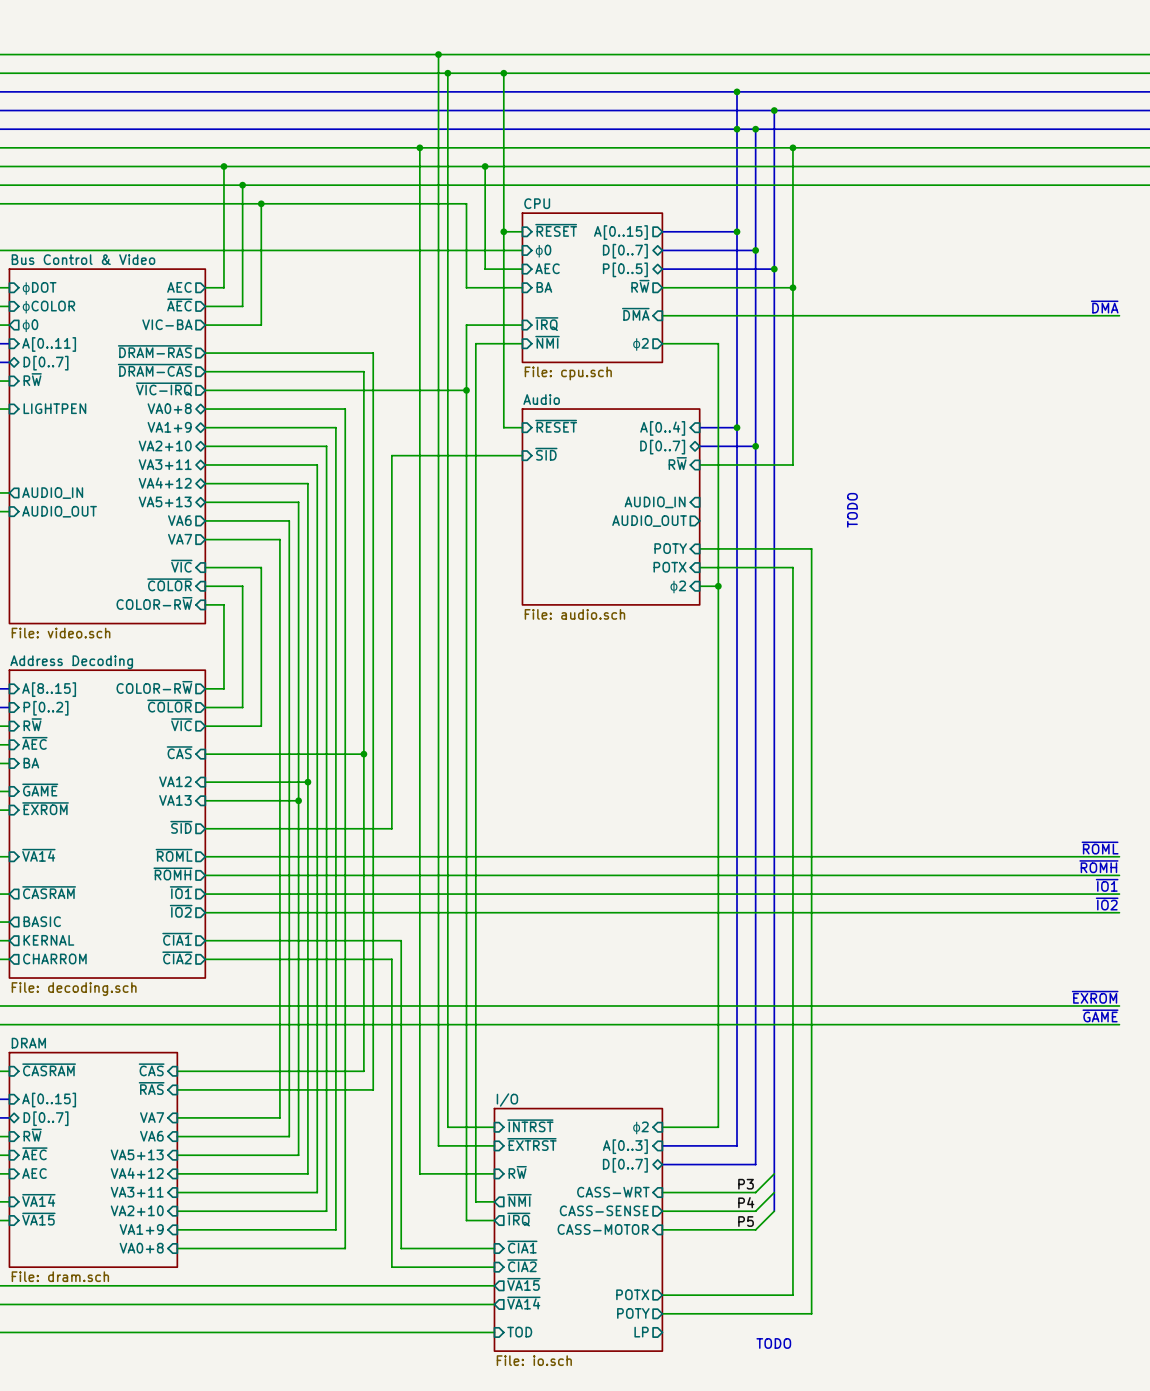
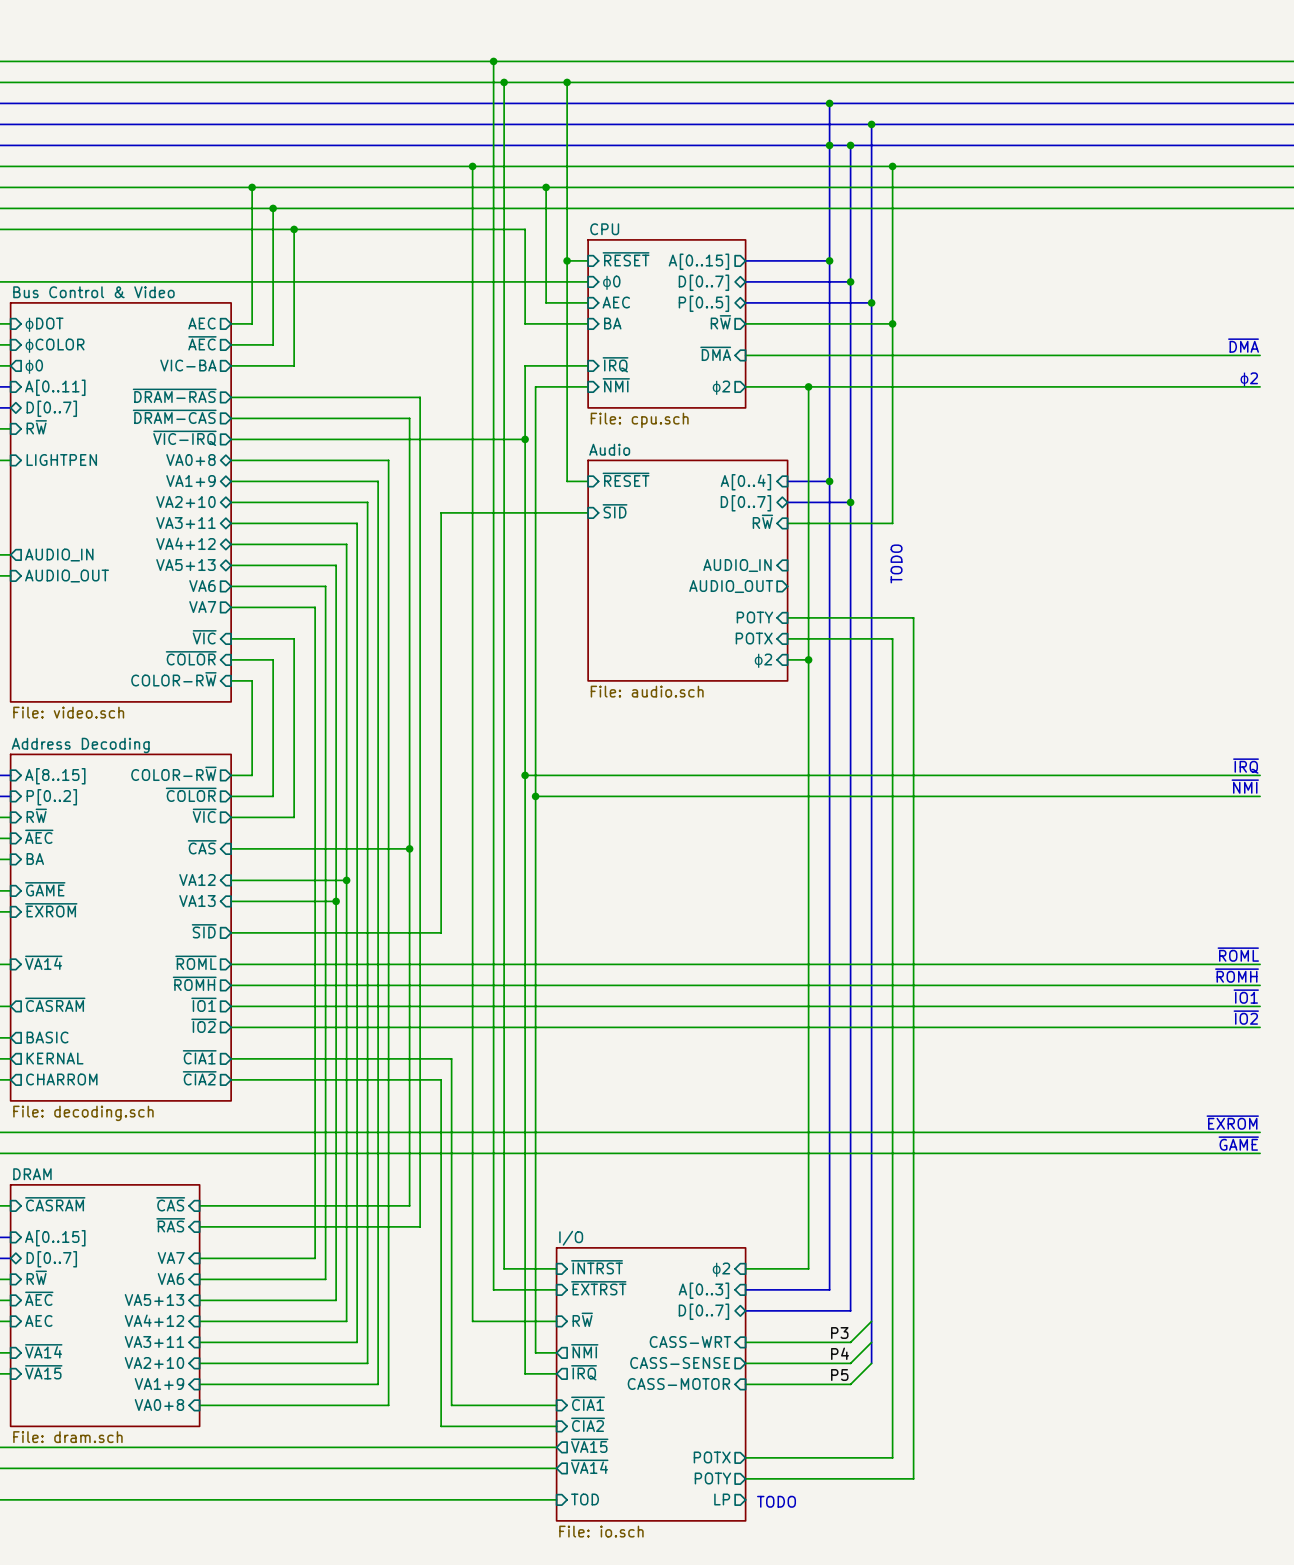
text: none -> ϕ2 (1248, 379)
wire: none -> (808, 386) (1260, 386)
junction: none -> (808, 386)
text position: TODO (852, 510) -> TODO (896, 563)
text: none -> ~{IRQ} (1246, 766)
wire: none -> (525, 775) (1260, 775)
junction: none -> (525, 775)
text: none -> ~{NMI} (1245, 786)
wire: none -> (535, 796) (1260, 796)
junction: none -> (535, 796)
text position: TODO (773, 1343) -> TODO (776, 1501)

